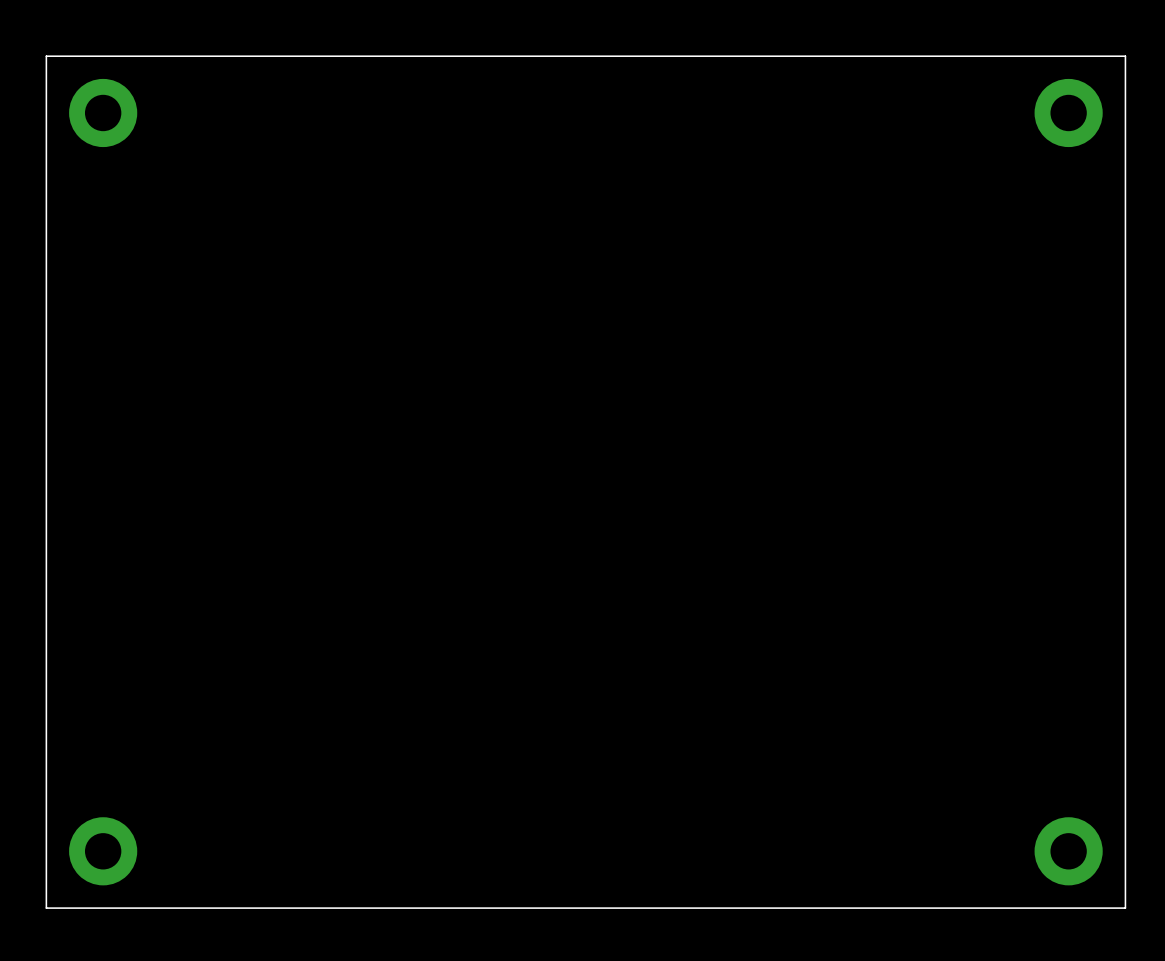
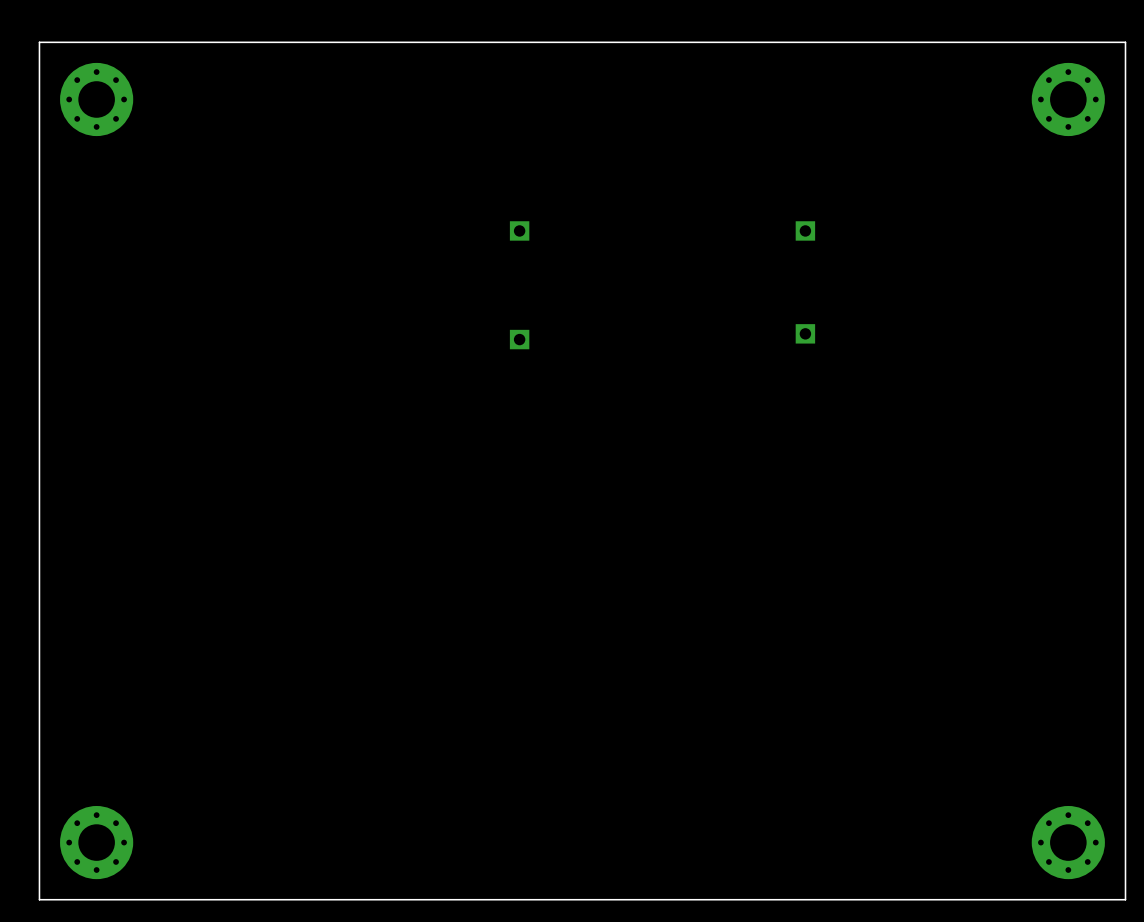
via: (103, 112) -> none
part: none -> (96, 99)
via: (1068, 112) -> none
part: none -> (1068, 99)
part: none -> (519, 230)
part: none -> (805, 230)
part: none -> (805, 333)
part: none -> (519, 339)
via: (103, 851) -> none
part: none -> (96, 842)
via: (1068, 851) -> none
part: none -> (1068, 842)

